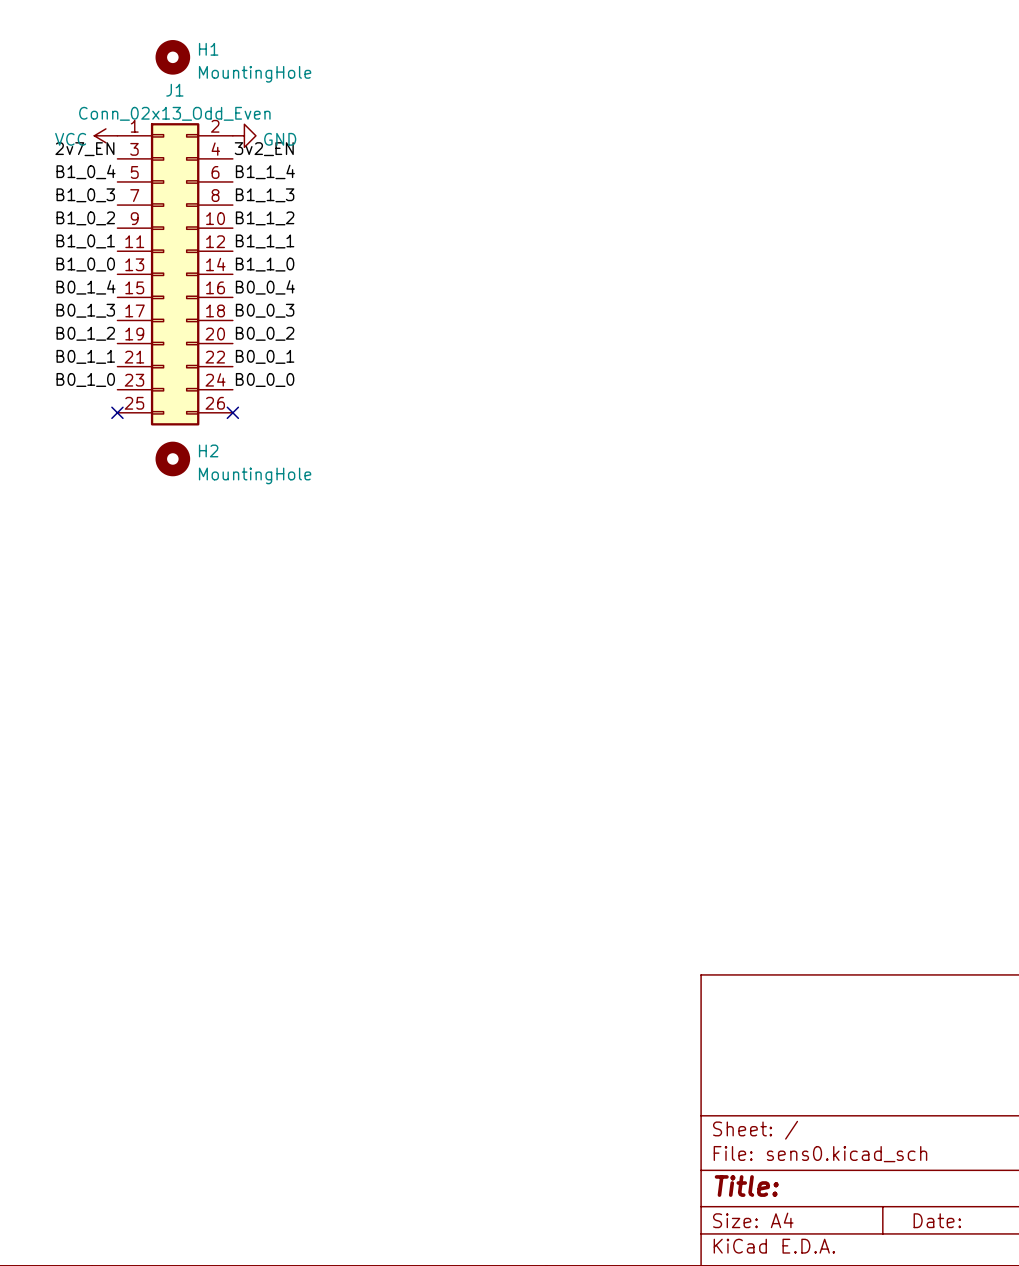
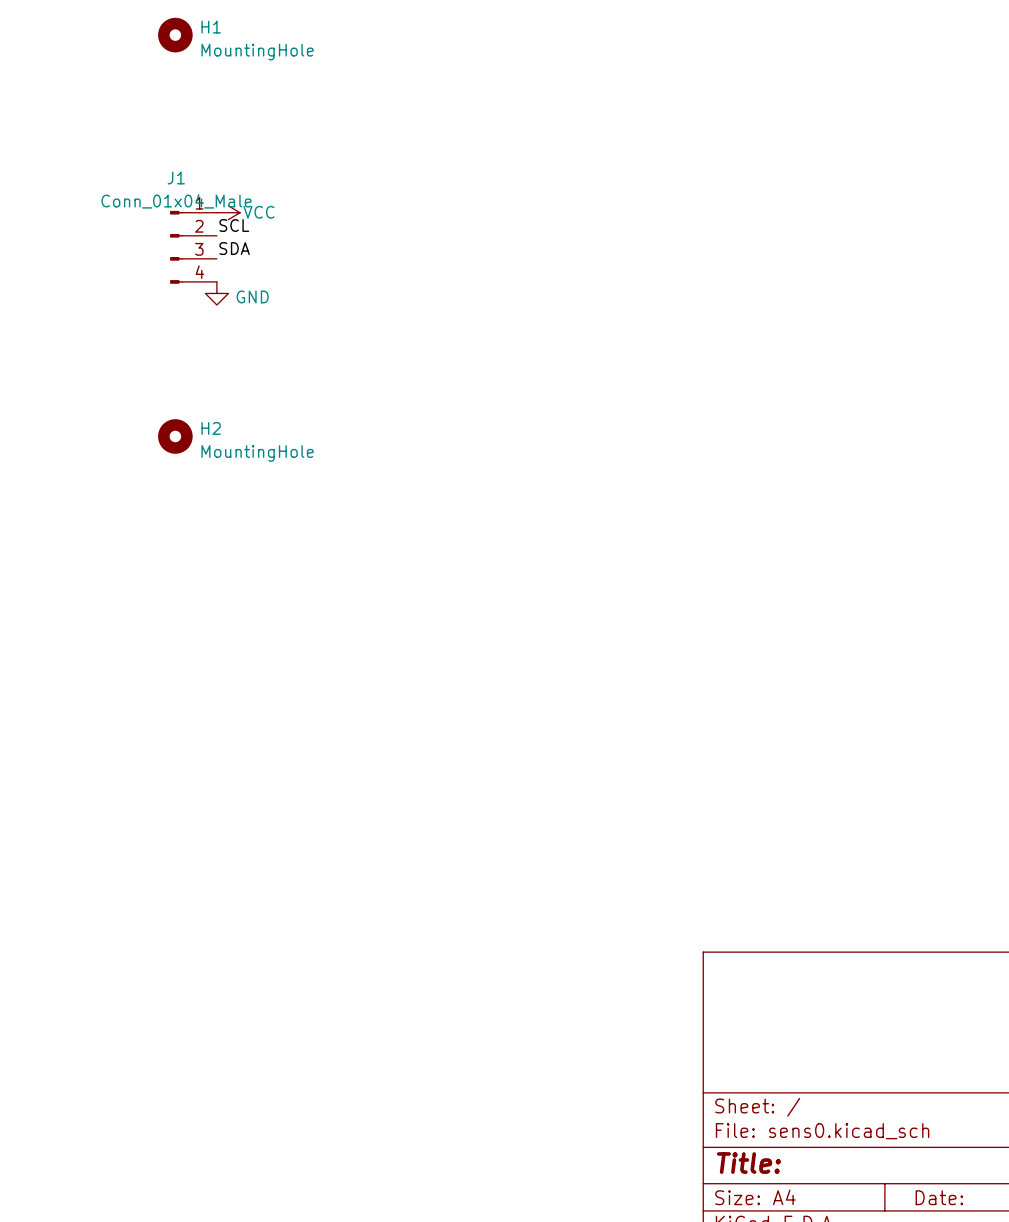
J1 name position: J1 (174, 90) -> J1 (176, 178)
J1 value: Conn_02x13_Odd_Even (174, 113) -> Conn_01x04_Male (176, 201)
J1 symbol: [117, 123, 233, 426] -> [170, 210, 217, 284]
power symbol rotation: 0° (105, 135) -> 180° (228, 212)
power symbol position: VCC (105, 135) -> VCC (228, 212)
power symbol rotation: 0° (244, 135) -> 90° clockwise (216, 293)
power symbol position: GND (244, 135) -> GND (216, 293)
label: 2v7_EN (84, 149) -> none
label: 3v2_EN (264, 149) -> none
label: B1_0_4 (86, 171) -> none
label: B1_1_4 (265, 171) -> none
label: B1_0_3 (85, 195) -> none
label: B1_1_3 (265, 195) -> none
label: B1_0_2 (85, 218) -> none
label: B1_1_2 (265, 218) -> none
label: B1_0_1 (85, 241) -> none
label: B1_1_1 (265, 241) -> none
label: none -> SCL (234, 225)
label: B1_0_0 (85, 264) -> none
label: B1_1_0 (265, 264) -> none
label: none -> SDA (234, 248)
label: B0_1_4 (86, 287) -> none
label: B0_0_4 (265, 287) -> none
label: B0_1_3 (85, 310) -> none
label: B0_0_3 (265, 310) -> none
label: B0_1_2 (85, 333) -> none
label: B0_0_2 (265, 333) -> none
label: B0_1_1 (85, 356) -> none
label: B0_0_1 (265, 356) -> none
label: B0_1_0 (85, 379) -> none
label: B0_0_0 (265, 379) -> none
no-connect mark: (117, 412) -> none
no-connect mark: (232, 412) -> none

